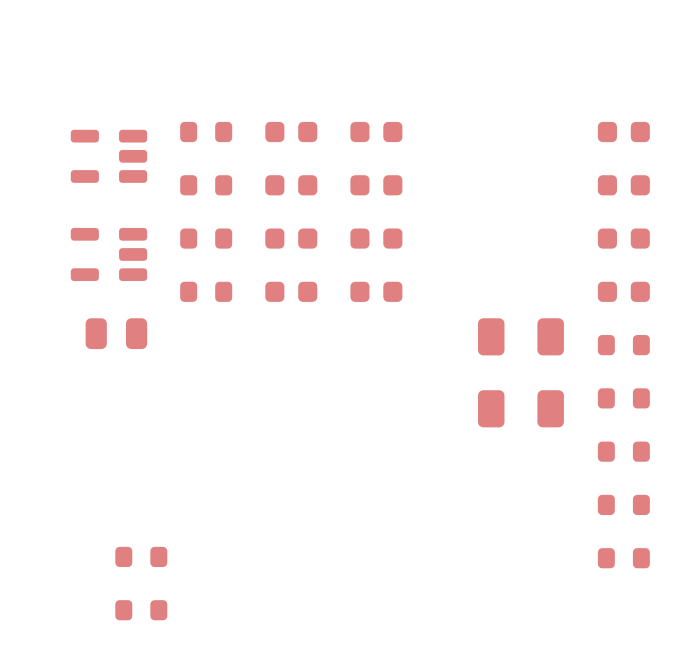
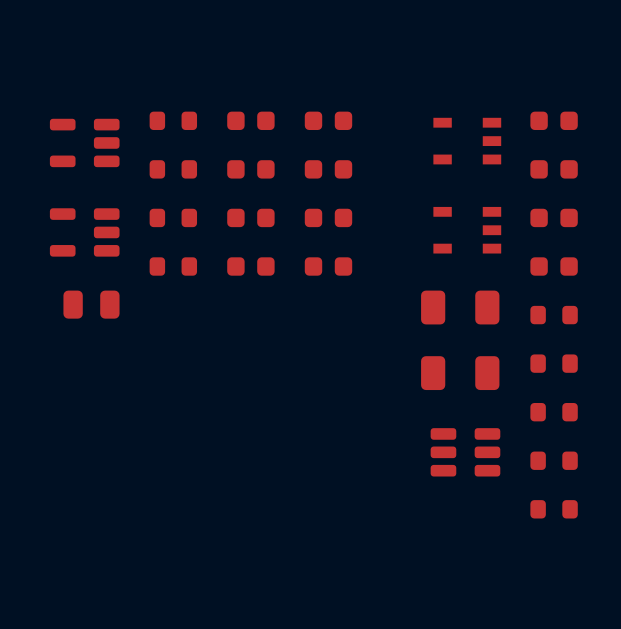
part: none -> (467, 141)
part: none -> (467, 230)
part: none -> (465, 452)
part: (141, 556) -> none
part: (141, 610) -> none

